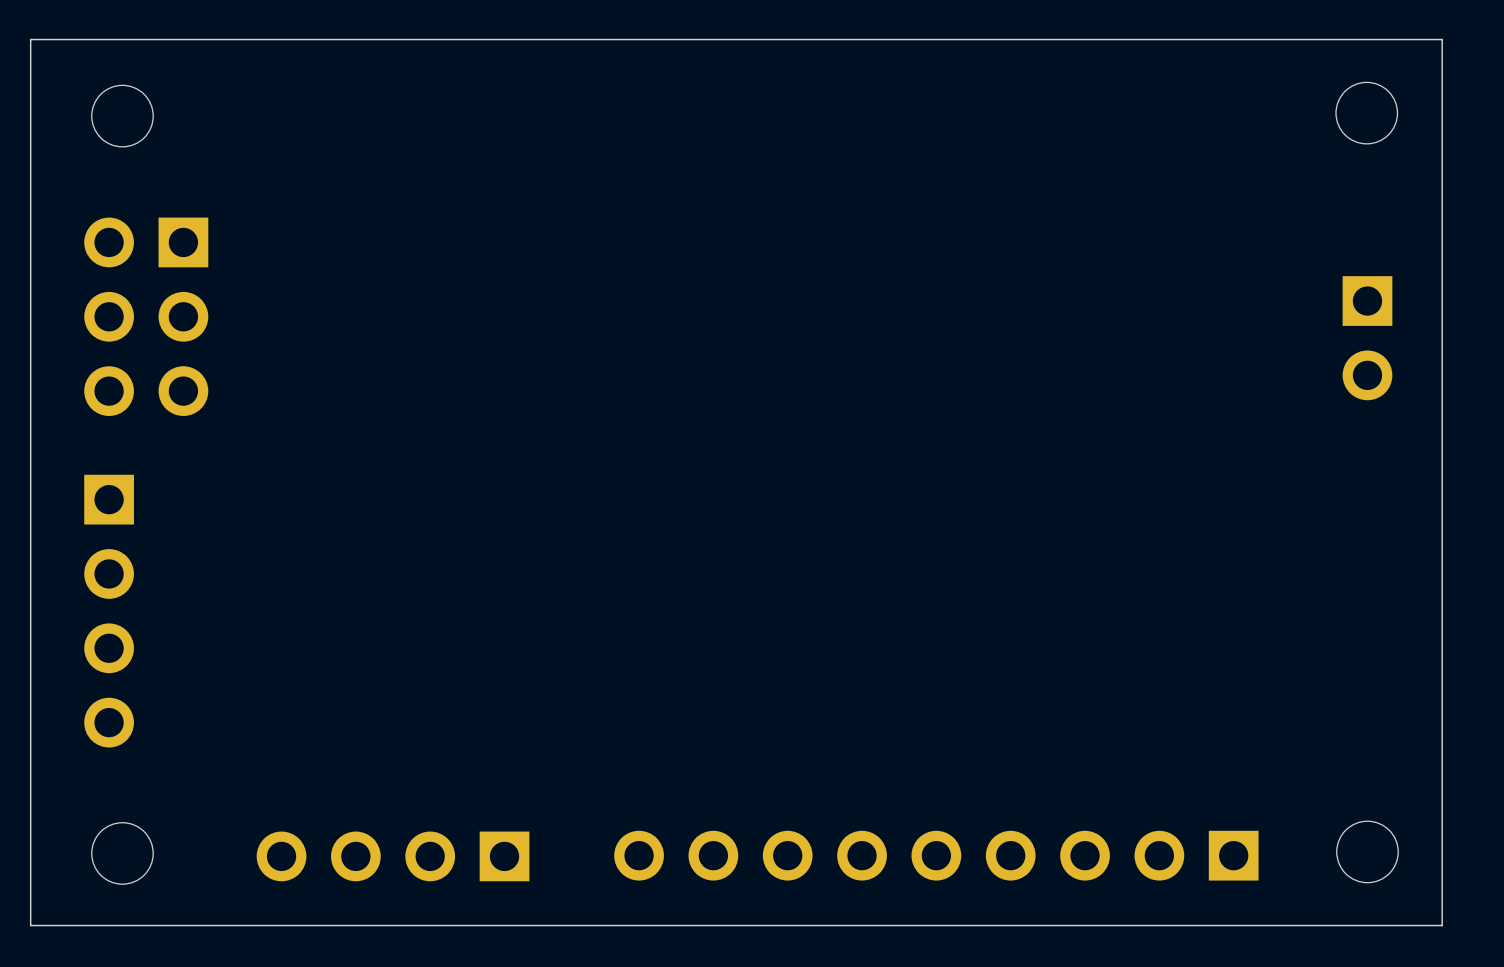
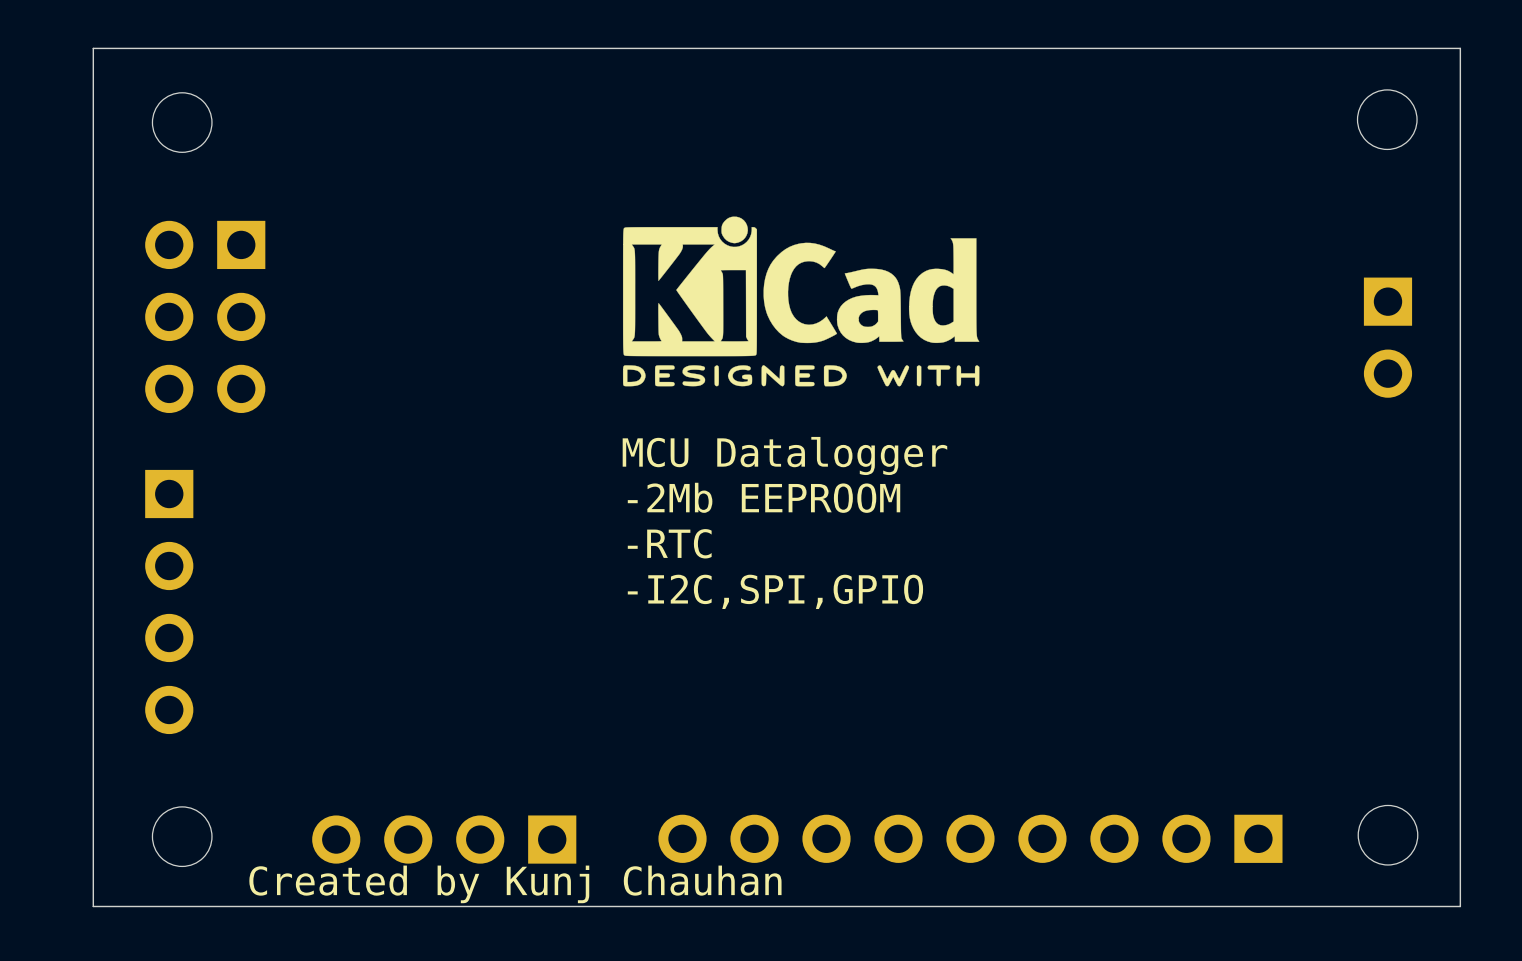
drawing: none -> [622, 216, 980, 387]
text: none -> MCU Datalogger (784, 455)
text: none -> -2Mb EEPROOM (764, 497)
text: none -> -RTC (669, 543)
text: none -> -I2C,SPI,GPIO (775, 591)
text: none -> Created by Kunj Chauhan (515, 884)

